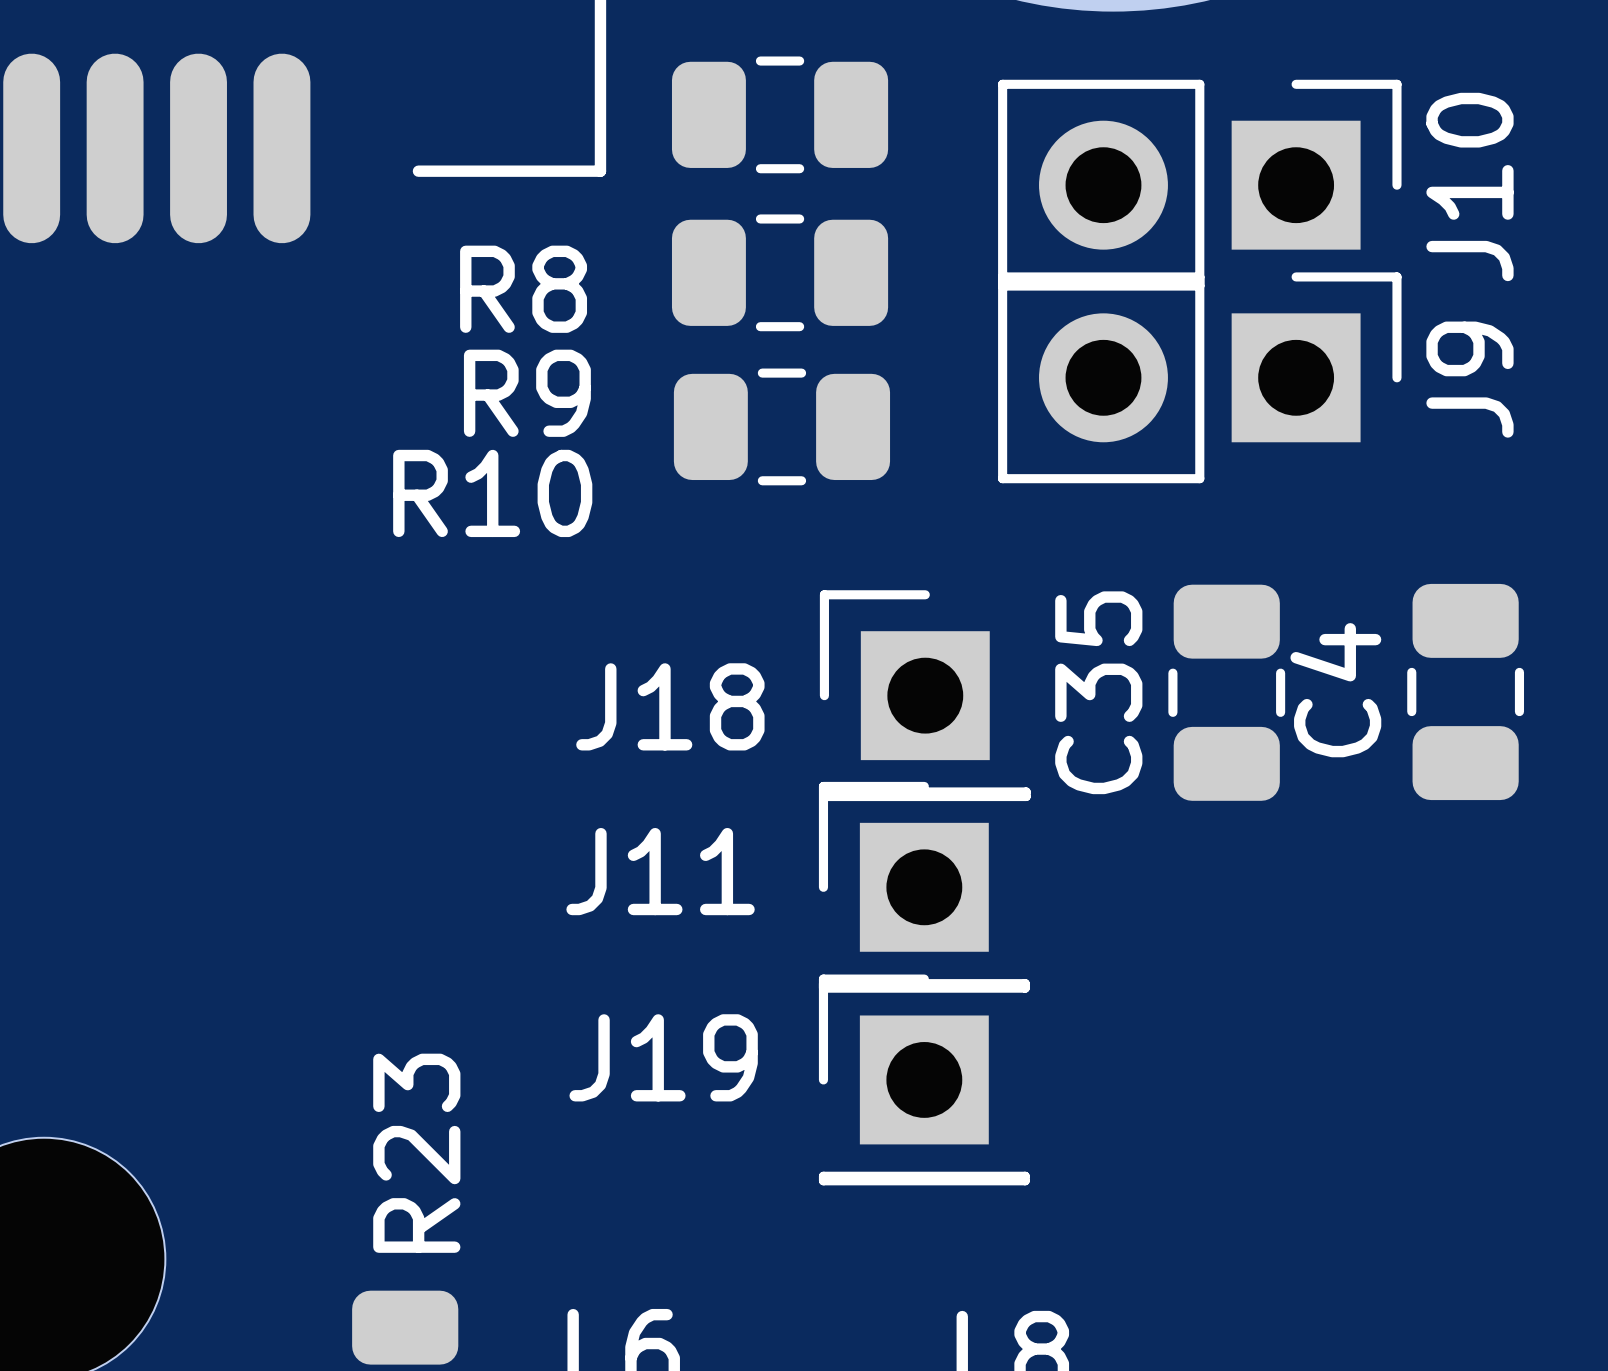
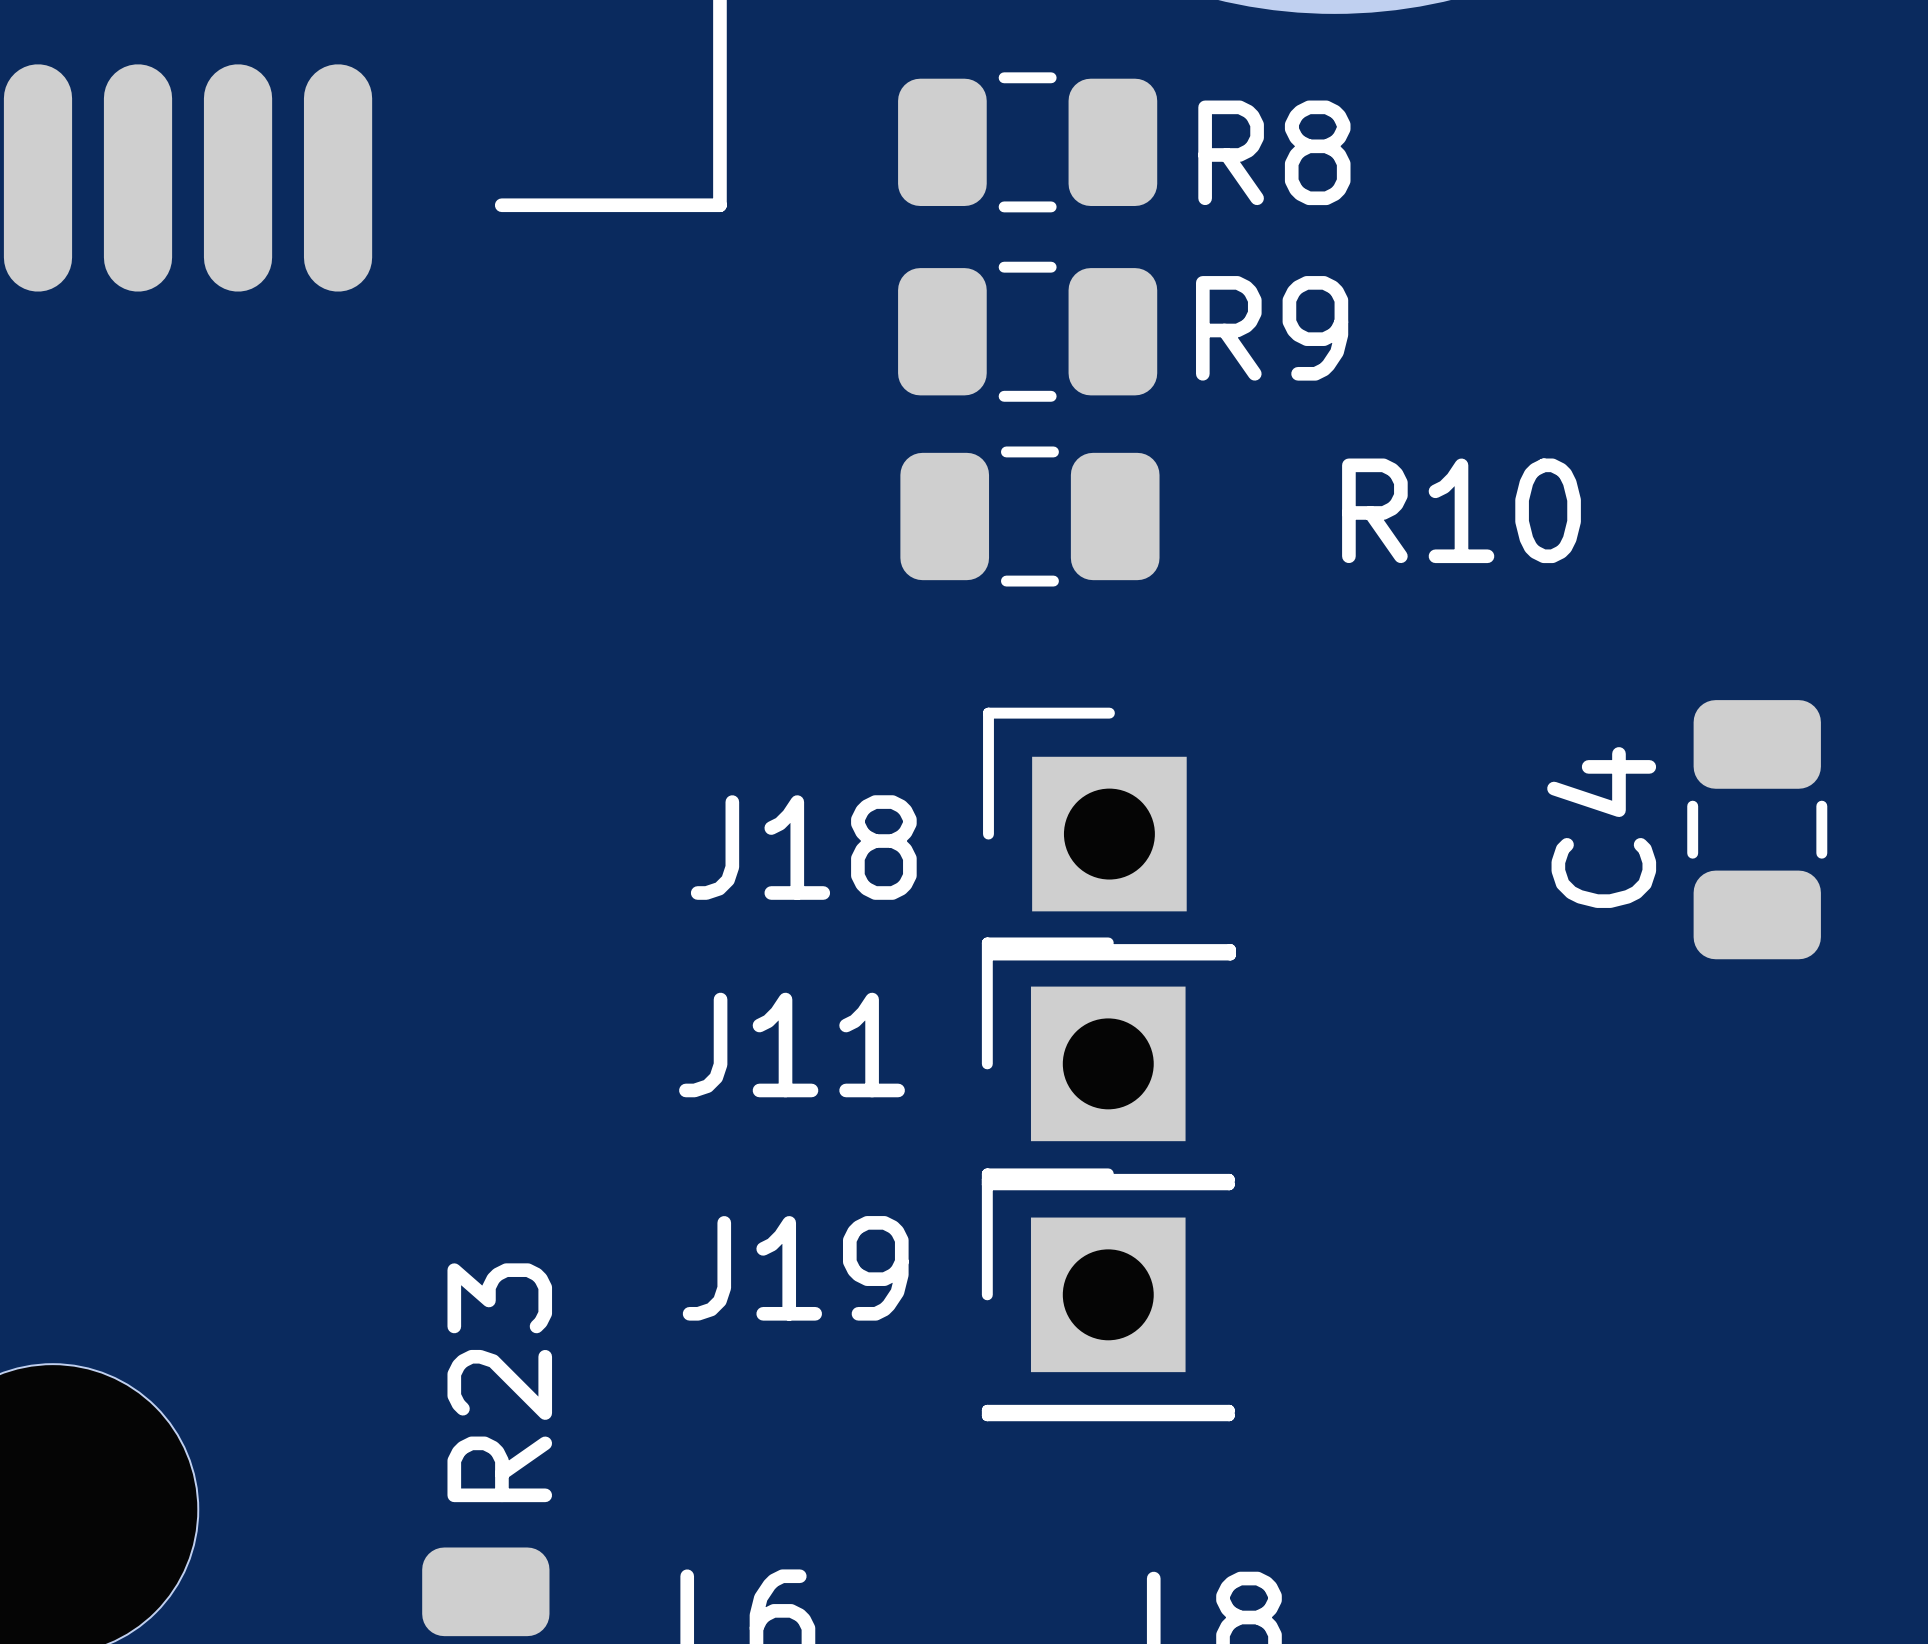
R8 position: (780, 114) -> (1027, 142)
J10: (1199, 185) -> none
R9 position: (780, 272) -> (1027, 331)
R8 name position: R8 (523, 289) -> R8 (1274, 152)
J9: (1199, 377) -> none
R9 name position: R9 (527, 393) -> R9 (1272, 328)
R10 position: (781, 426) -> (1029, 516)
R10 name position: R10 (492, 493) -> R10 (1461, 510)
C35: (1226, 692) -> none

